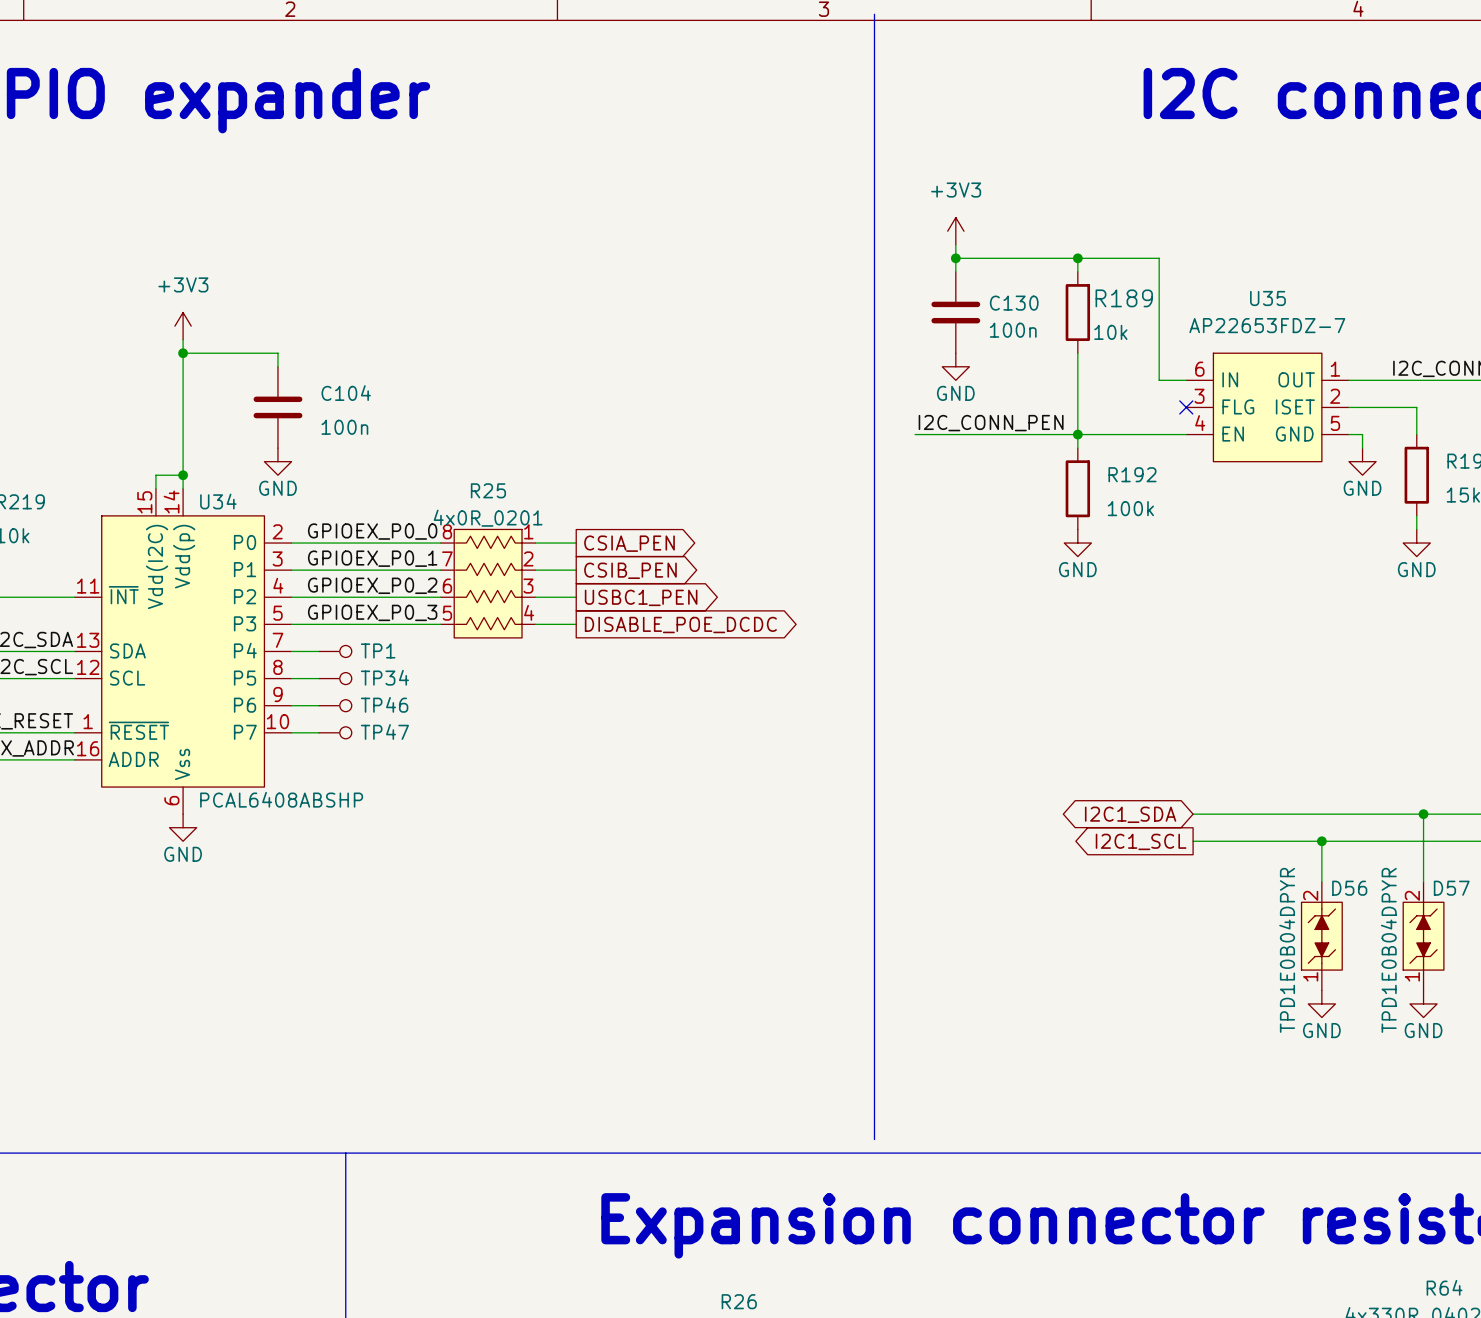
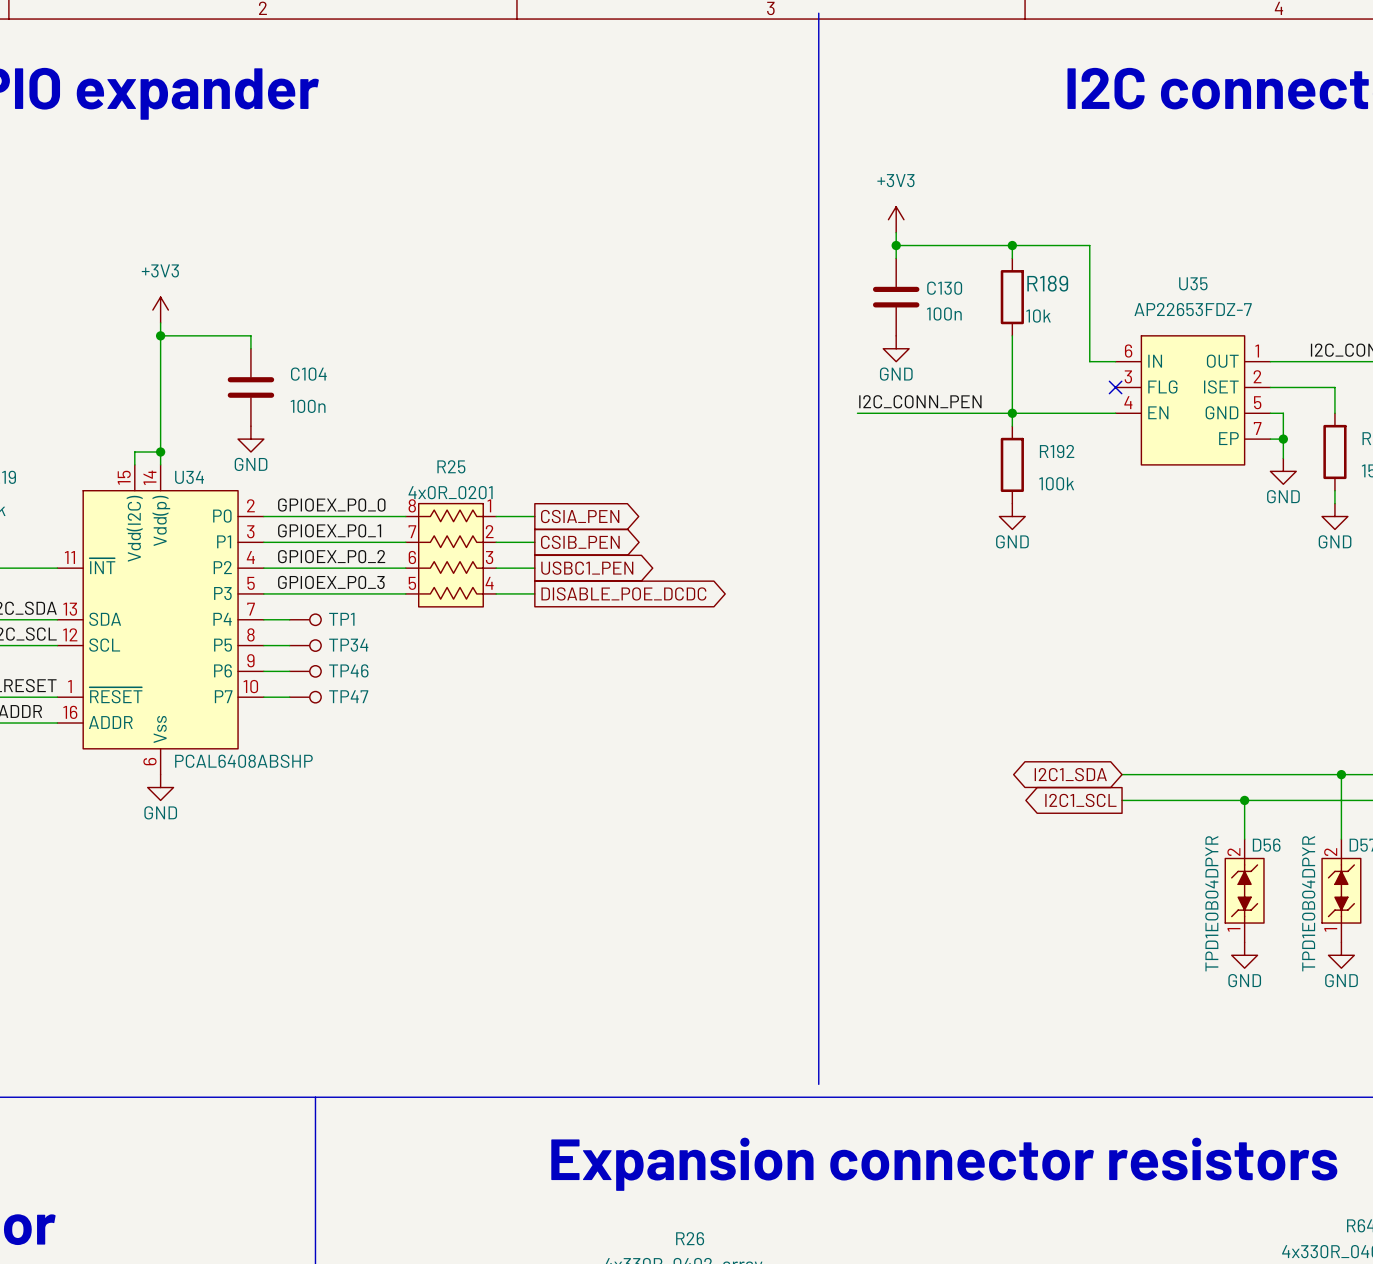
U35 symbol: [1186, 353, 1349, 462] -> [1115, 335, 1271, 465]
wire: none -> (1283, 426) (1283, 458)
power symbol position: GND (1362, 461) -> GND (1283, 471)
junction: none -> (1283, 439)

